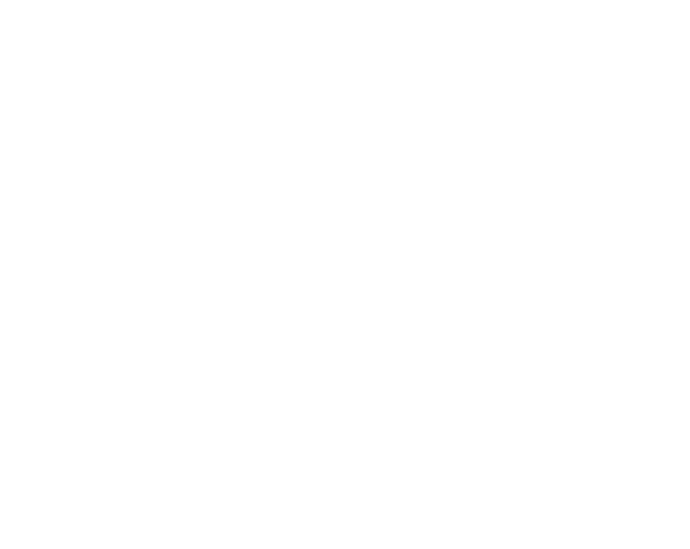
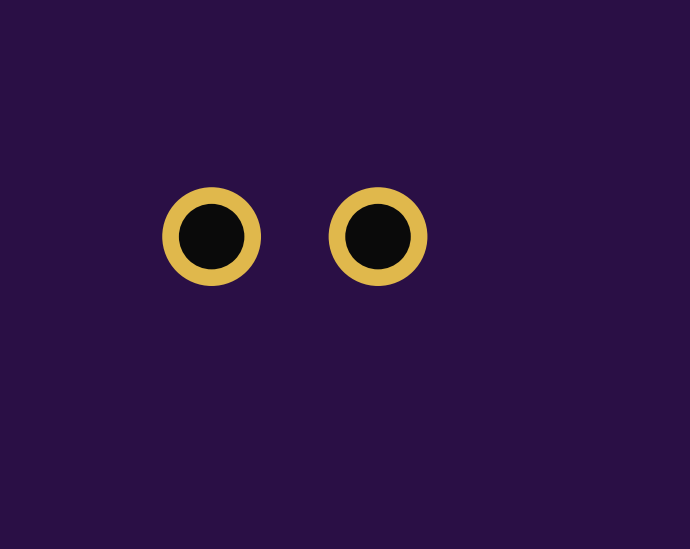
part: none -> (294, 236)

